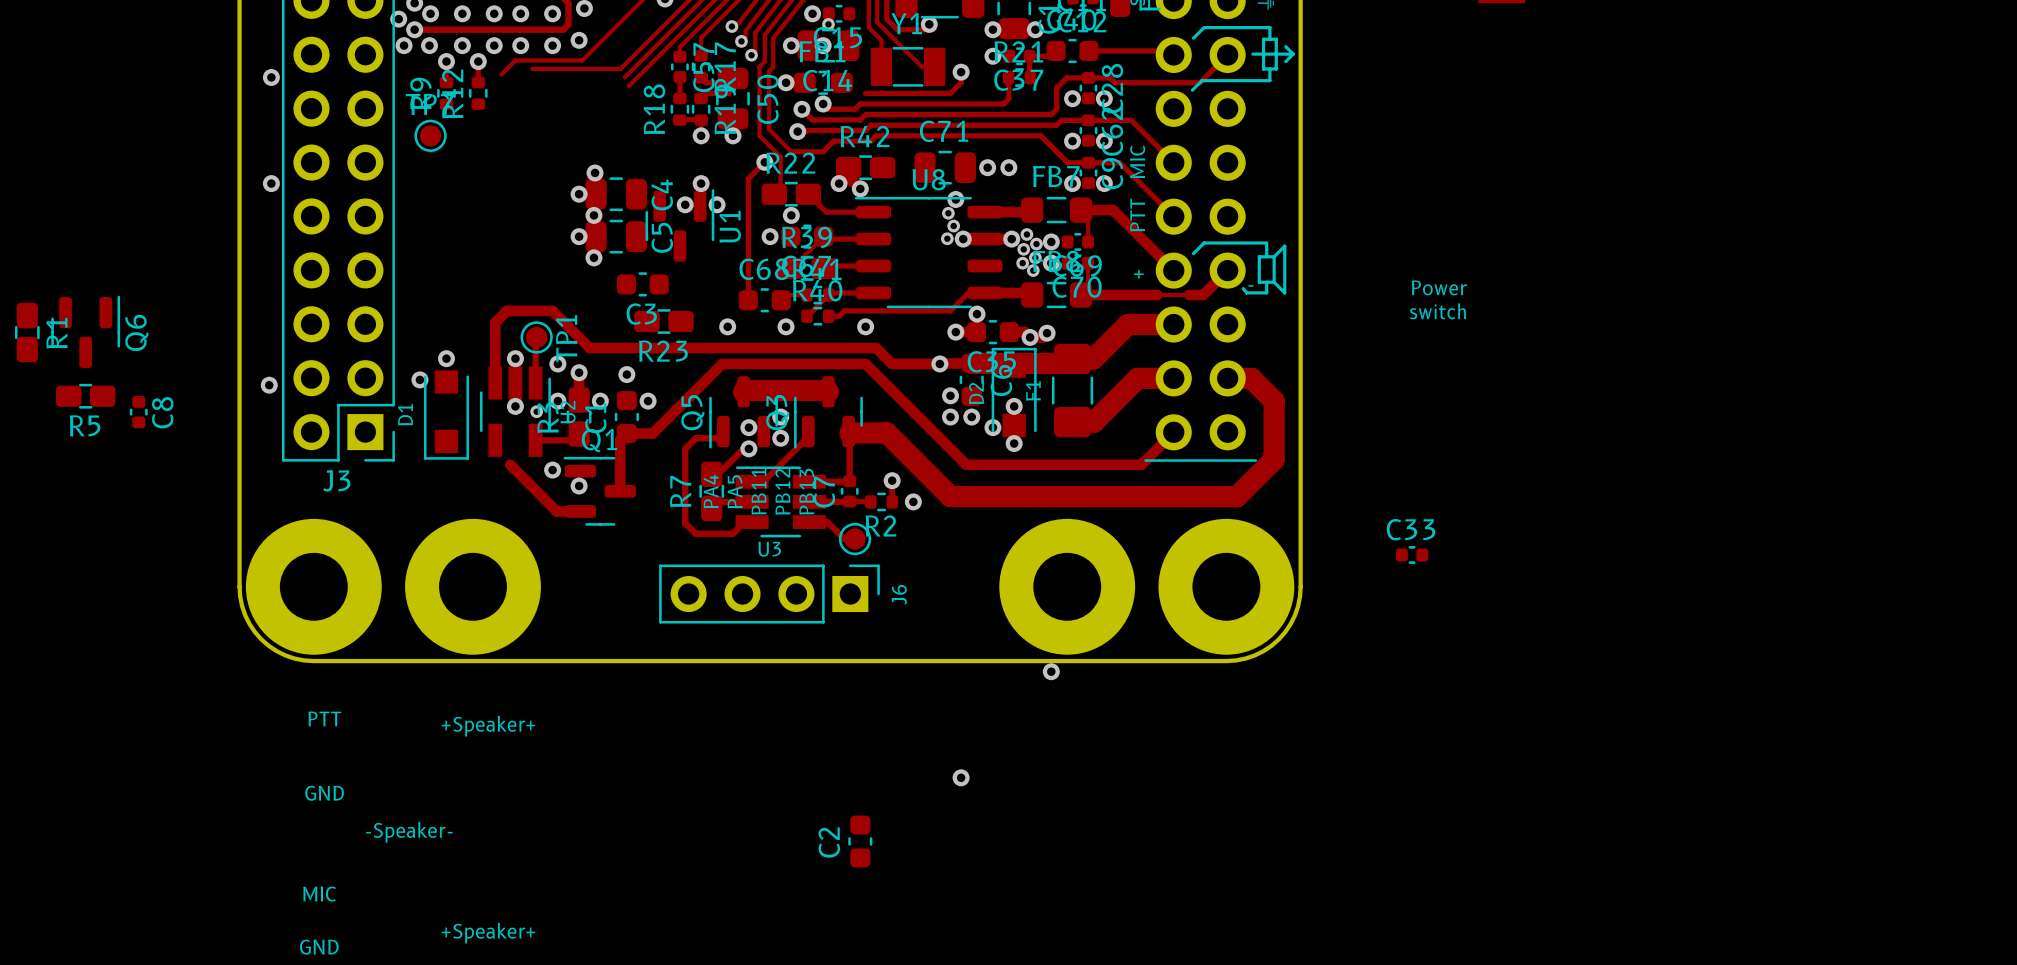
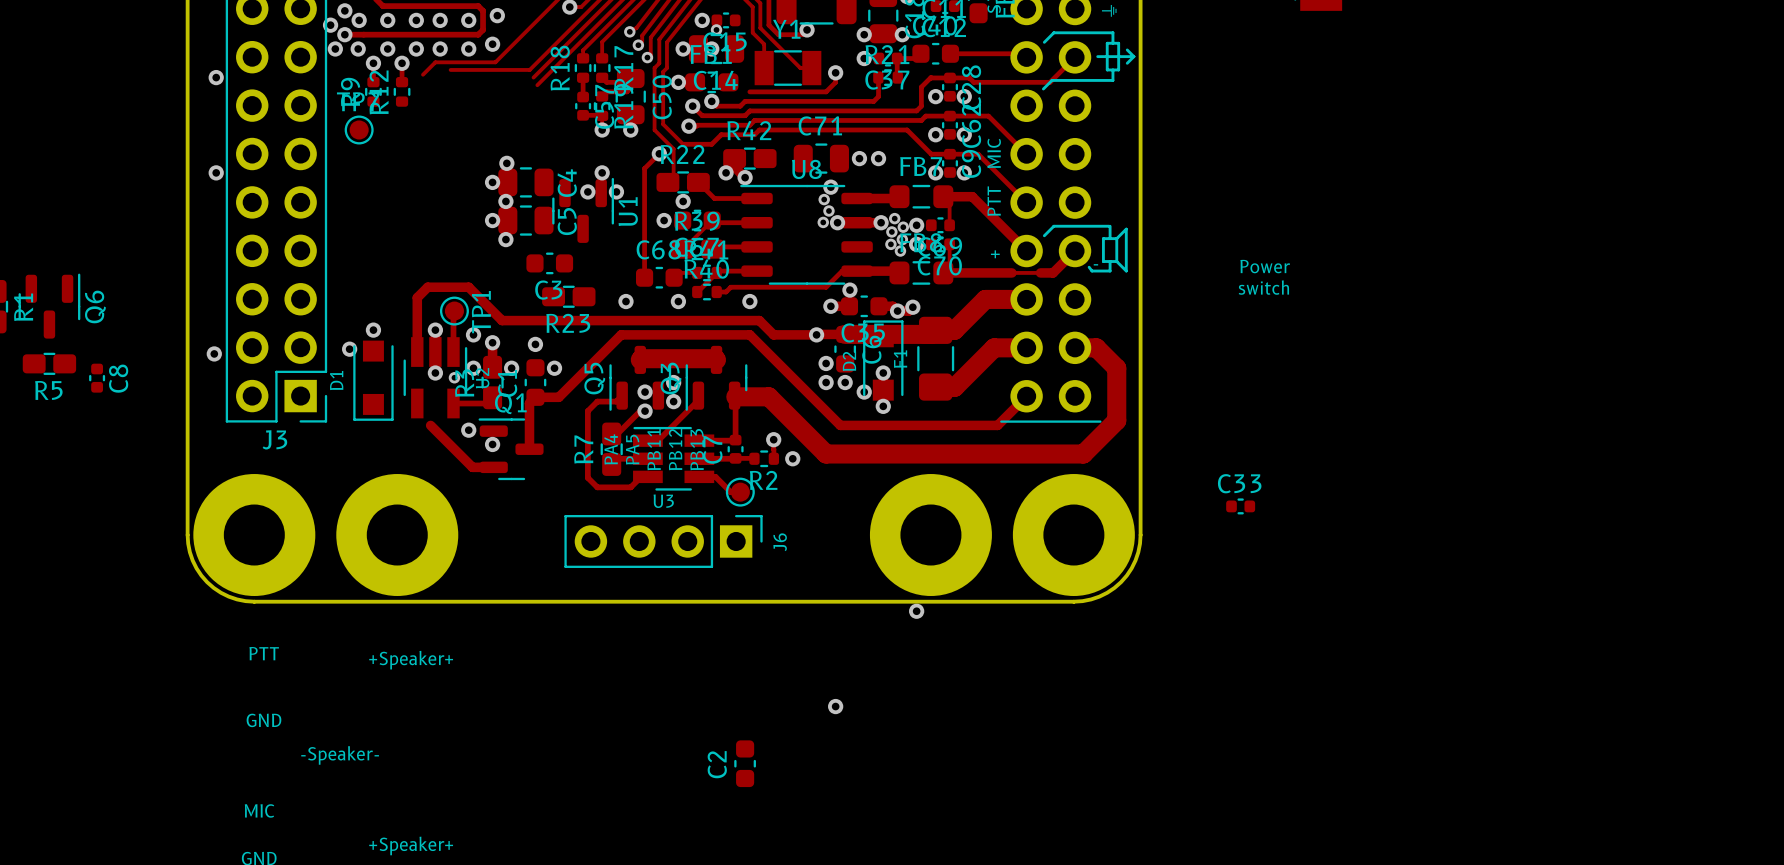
C57 position: (679, 66) -> (583, 106)
R18 position: (679, 109) -> (583, 68)

